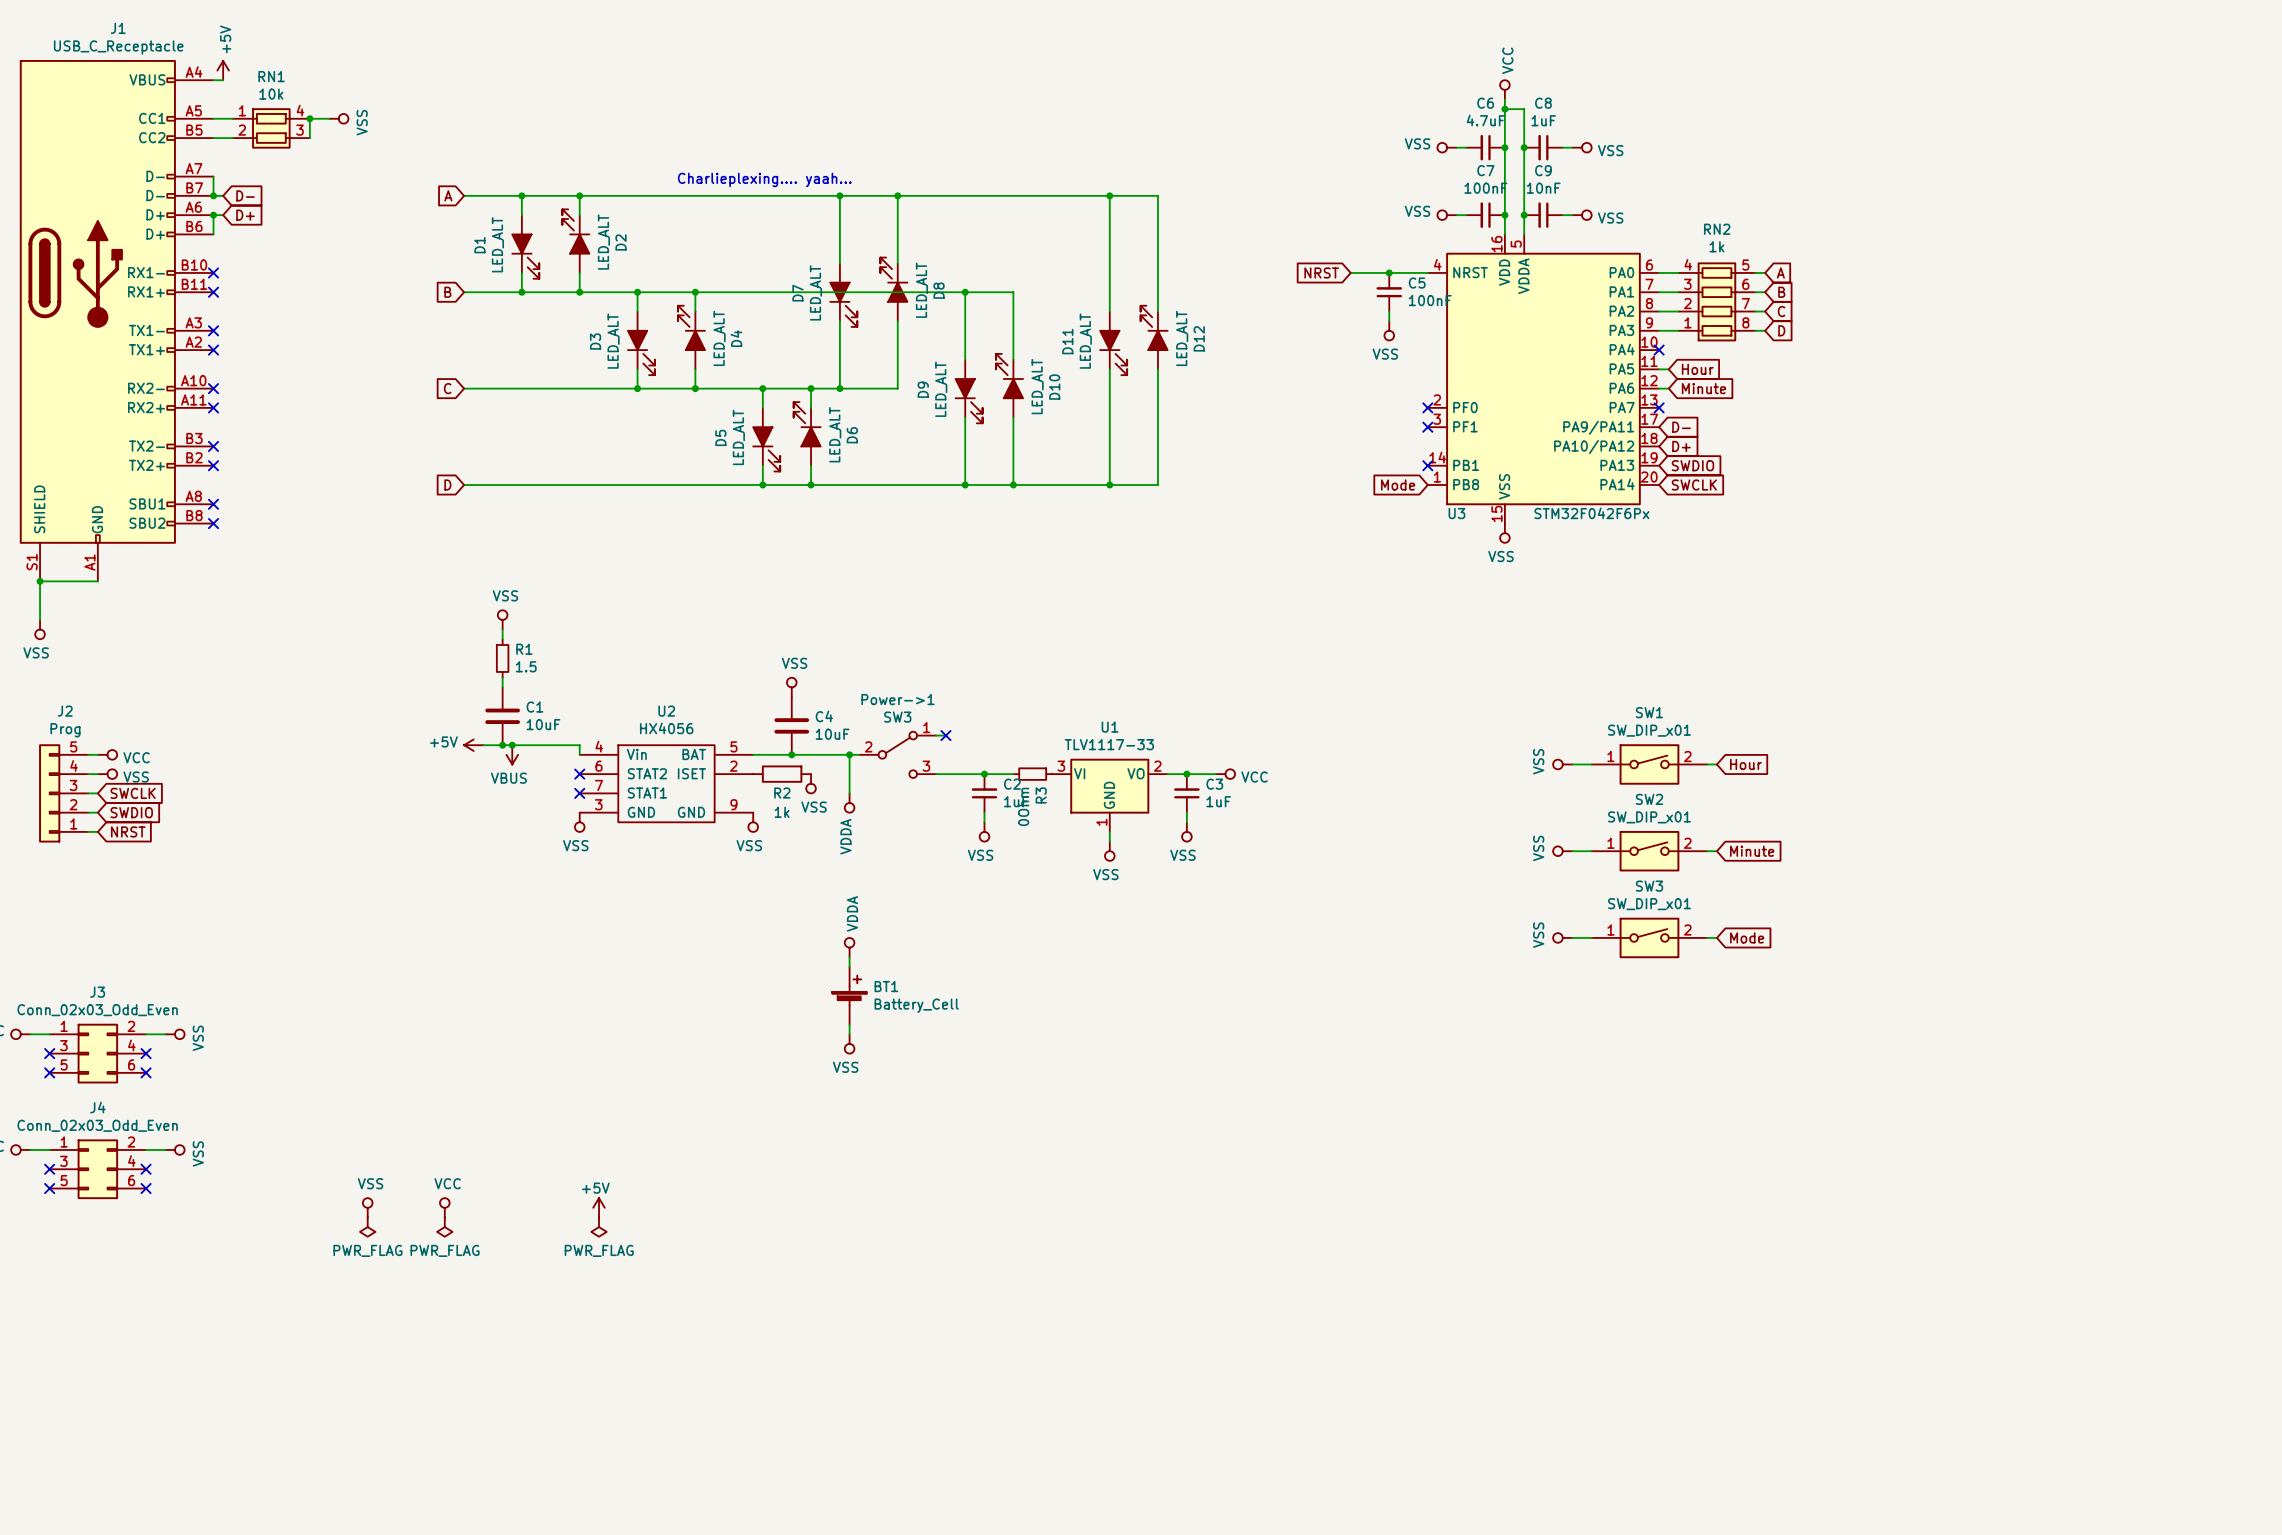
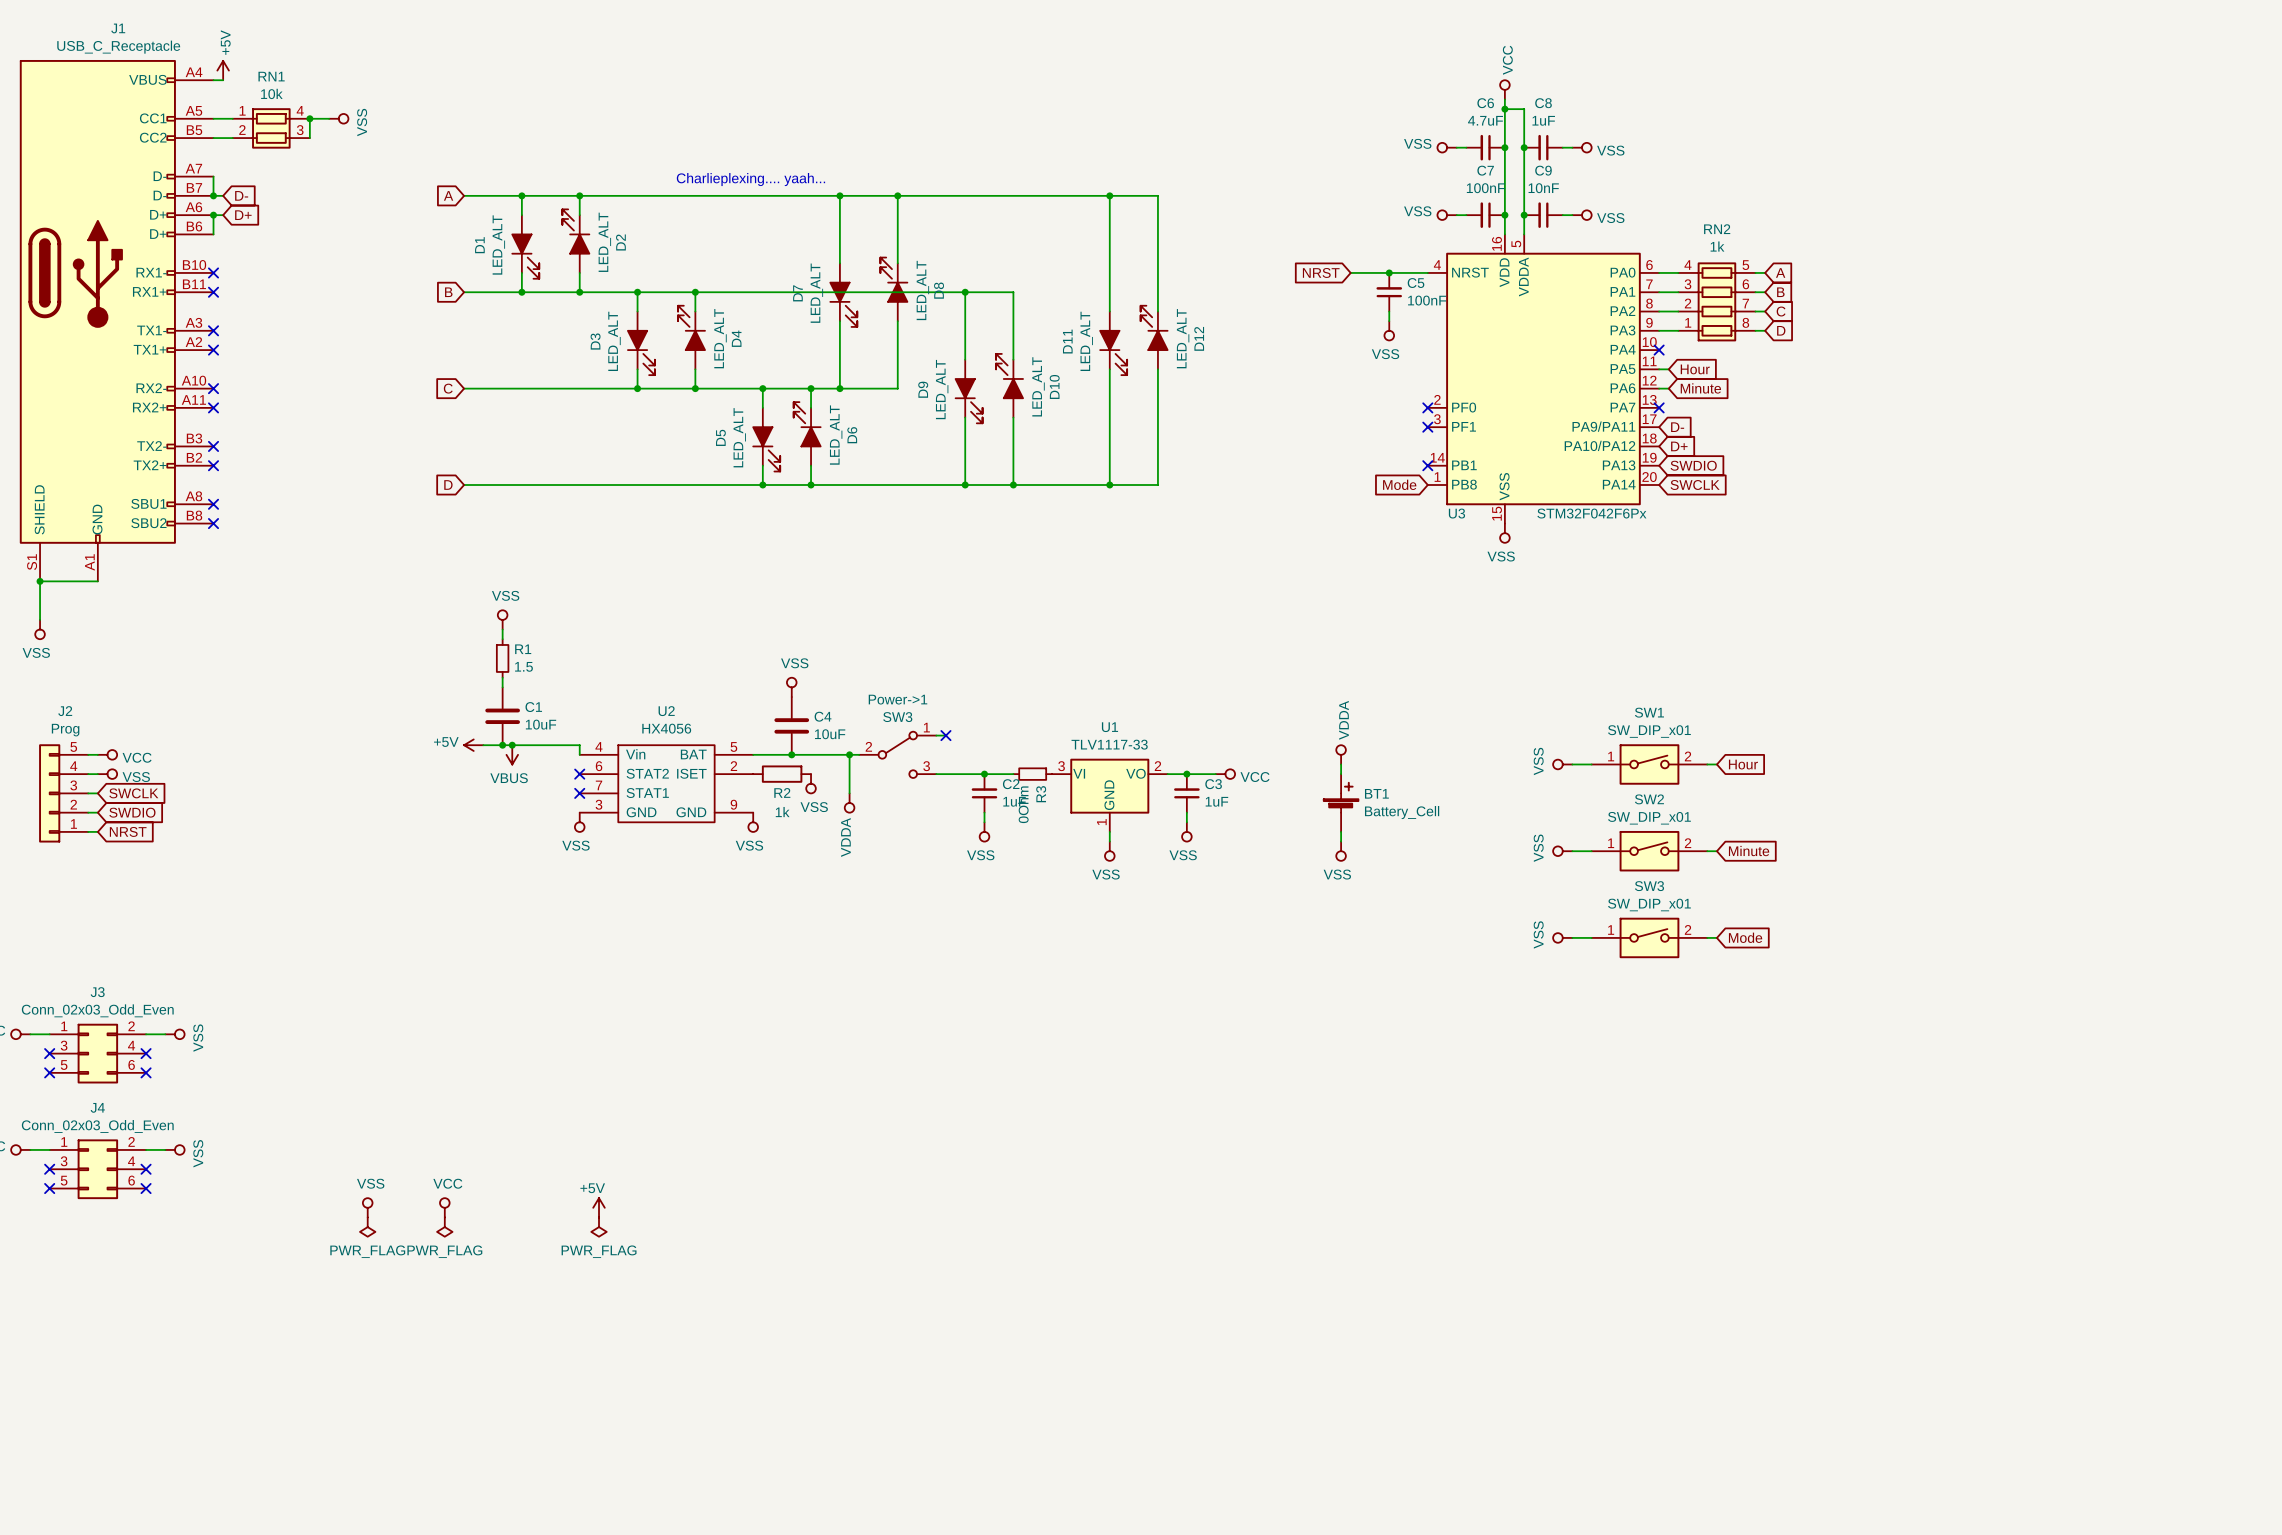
power symbol: none -> VDDA (1341, 754)
wire: none -> (1341, 764) (1341, 774)
wire: none -> (1341, 831) (1341, 841)
power symbol: none -> VSS (1341, 851)
power symbol: VDDA (849, 947) -> none
wire: (849, 957) (849, 966) -> none
BT1 position: (849, 995) -> (1341, 803)
wire: (849, 1024) (849, 1034) -> none
power symbol: VSS (849, 1043) -> none

